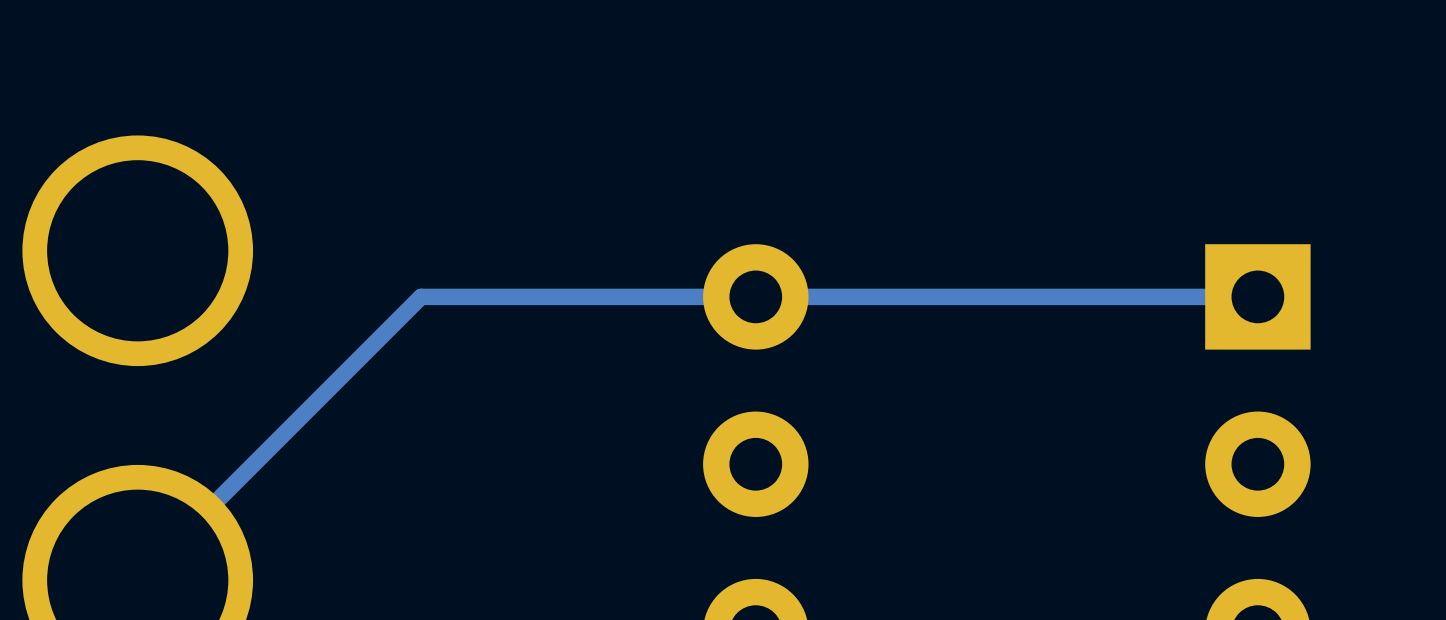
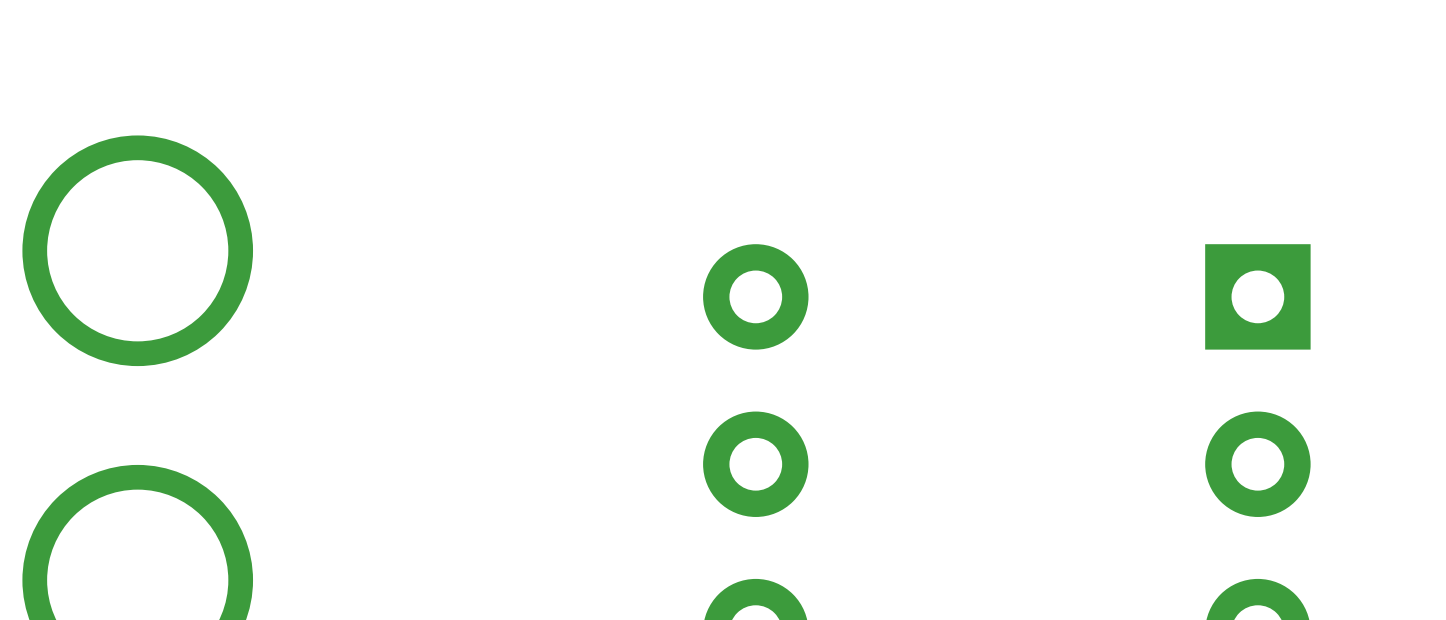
track: (1257, 296) (421, 296) (137, 580) -> none

